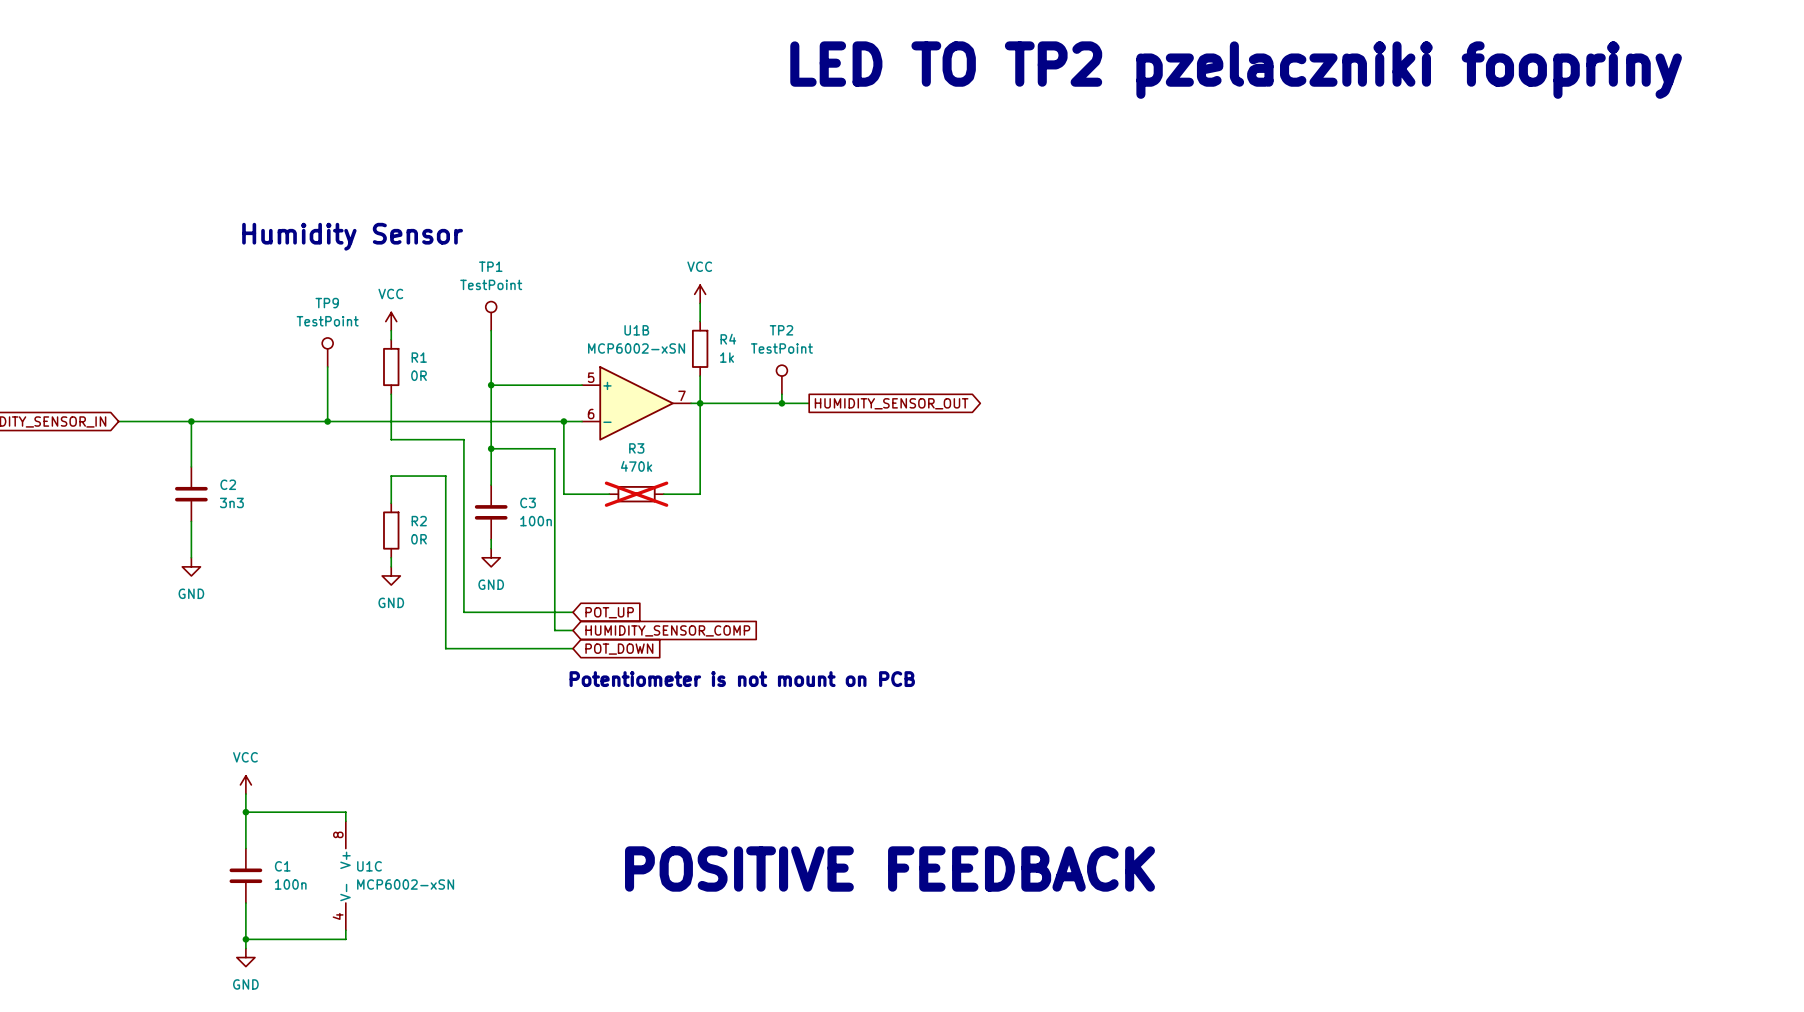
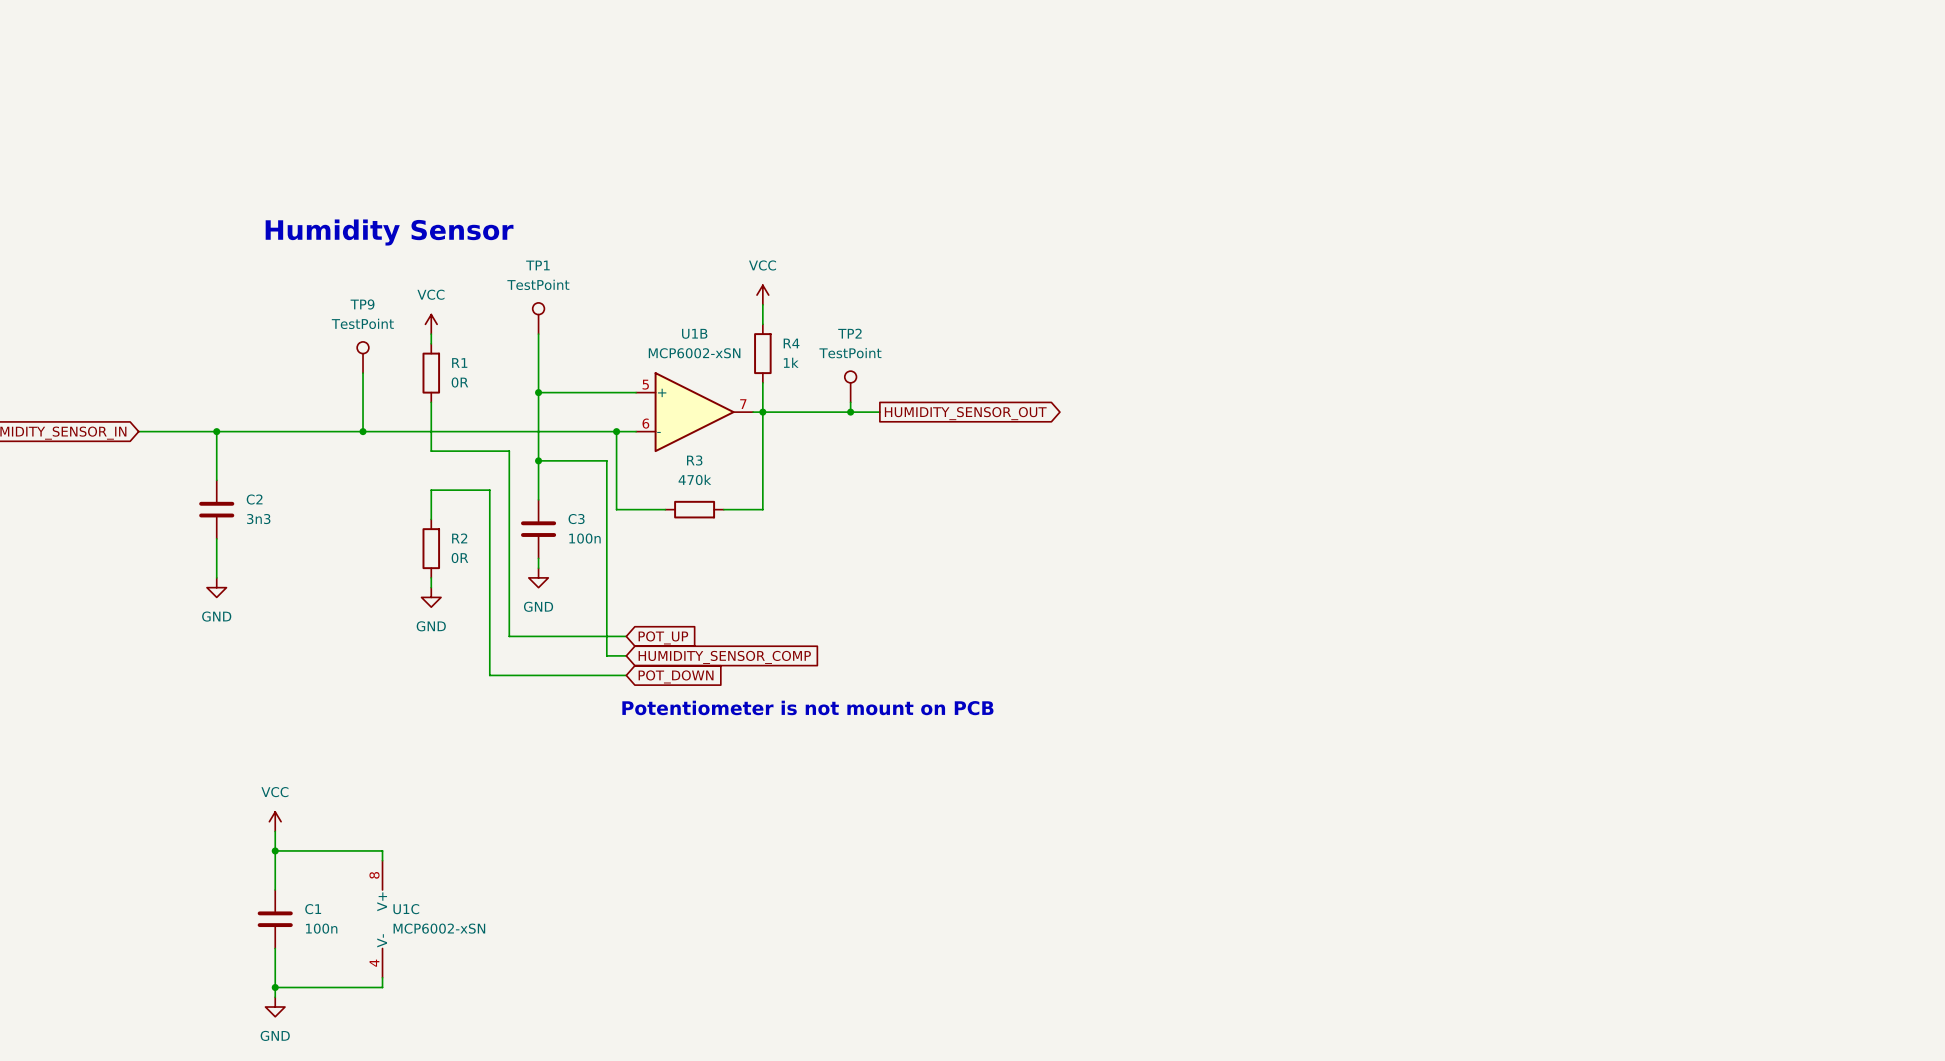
text: LED TO TP2 pzelaczniki foopriny (1236, 70) -> none
R3 do-not-place cross: (636, 494) -> none
text: POSITIVE FEEDBACK (889, 868) -> none

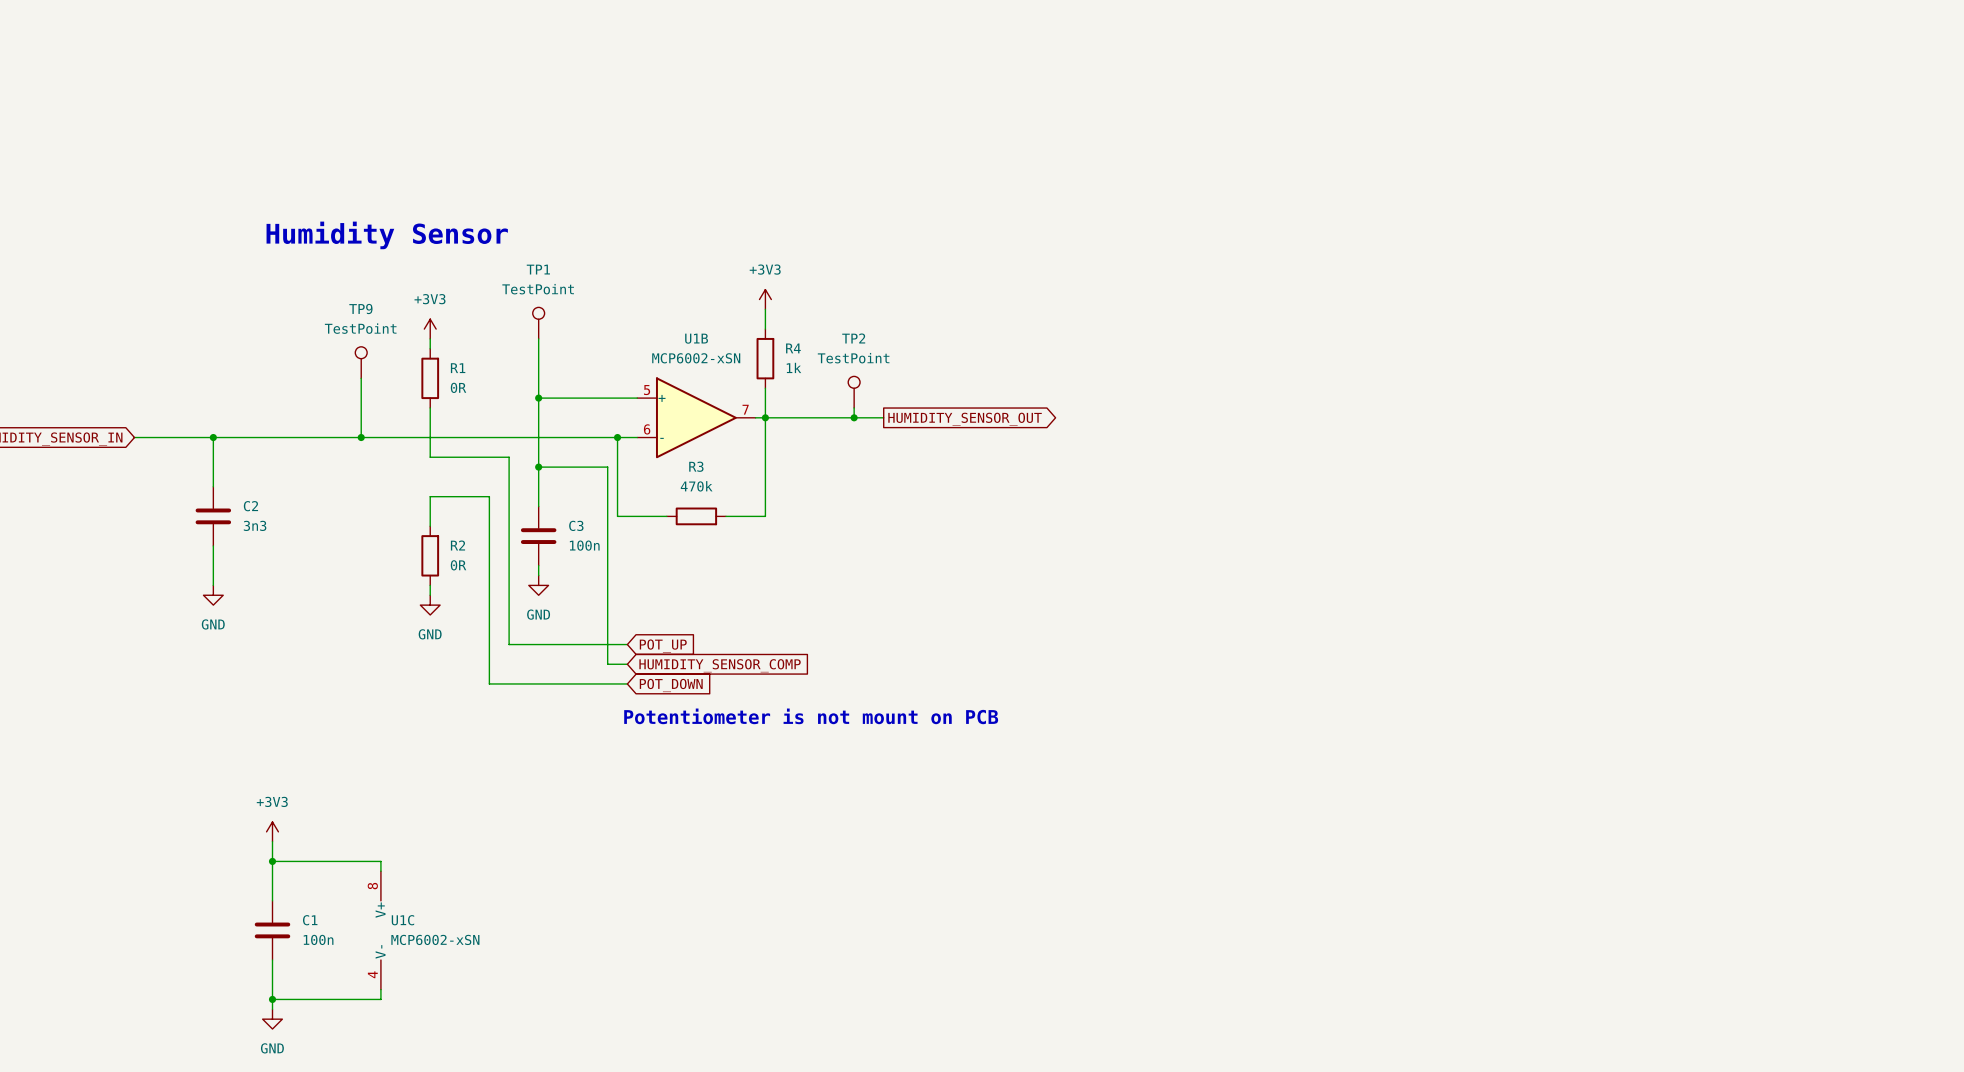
power symbol: VCC (762, 295) -> +3V3 (765, 299)
power symbol: VCC (431, 324) -> +3V3 (430, 329)
power symbol: VCC (275, 821) -> +3V3 (272, 831)

